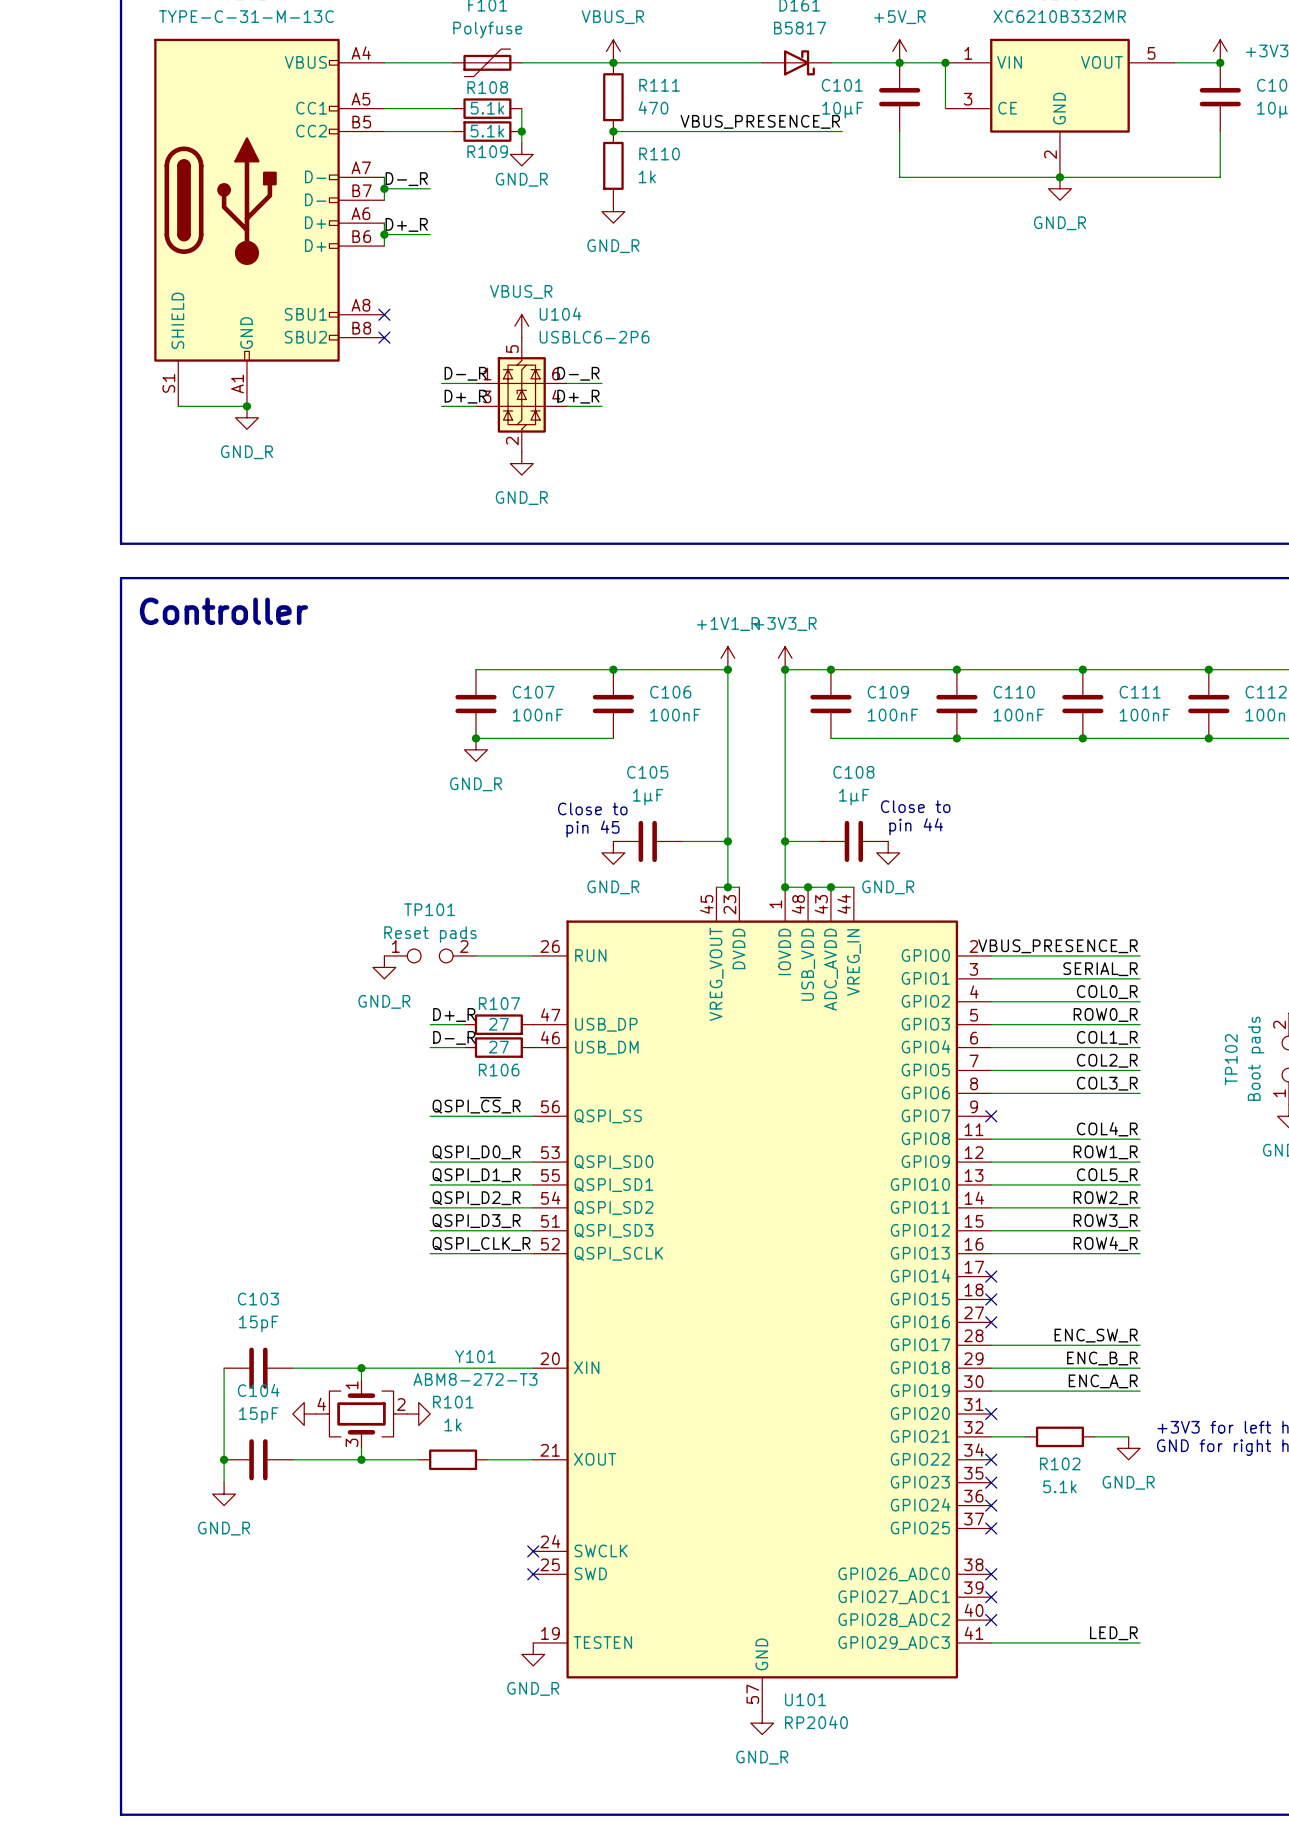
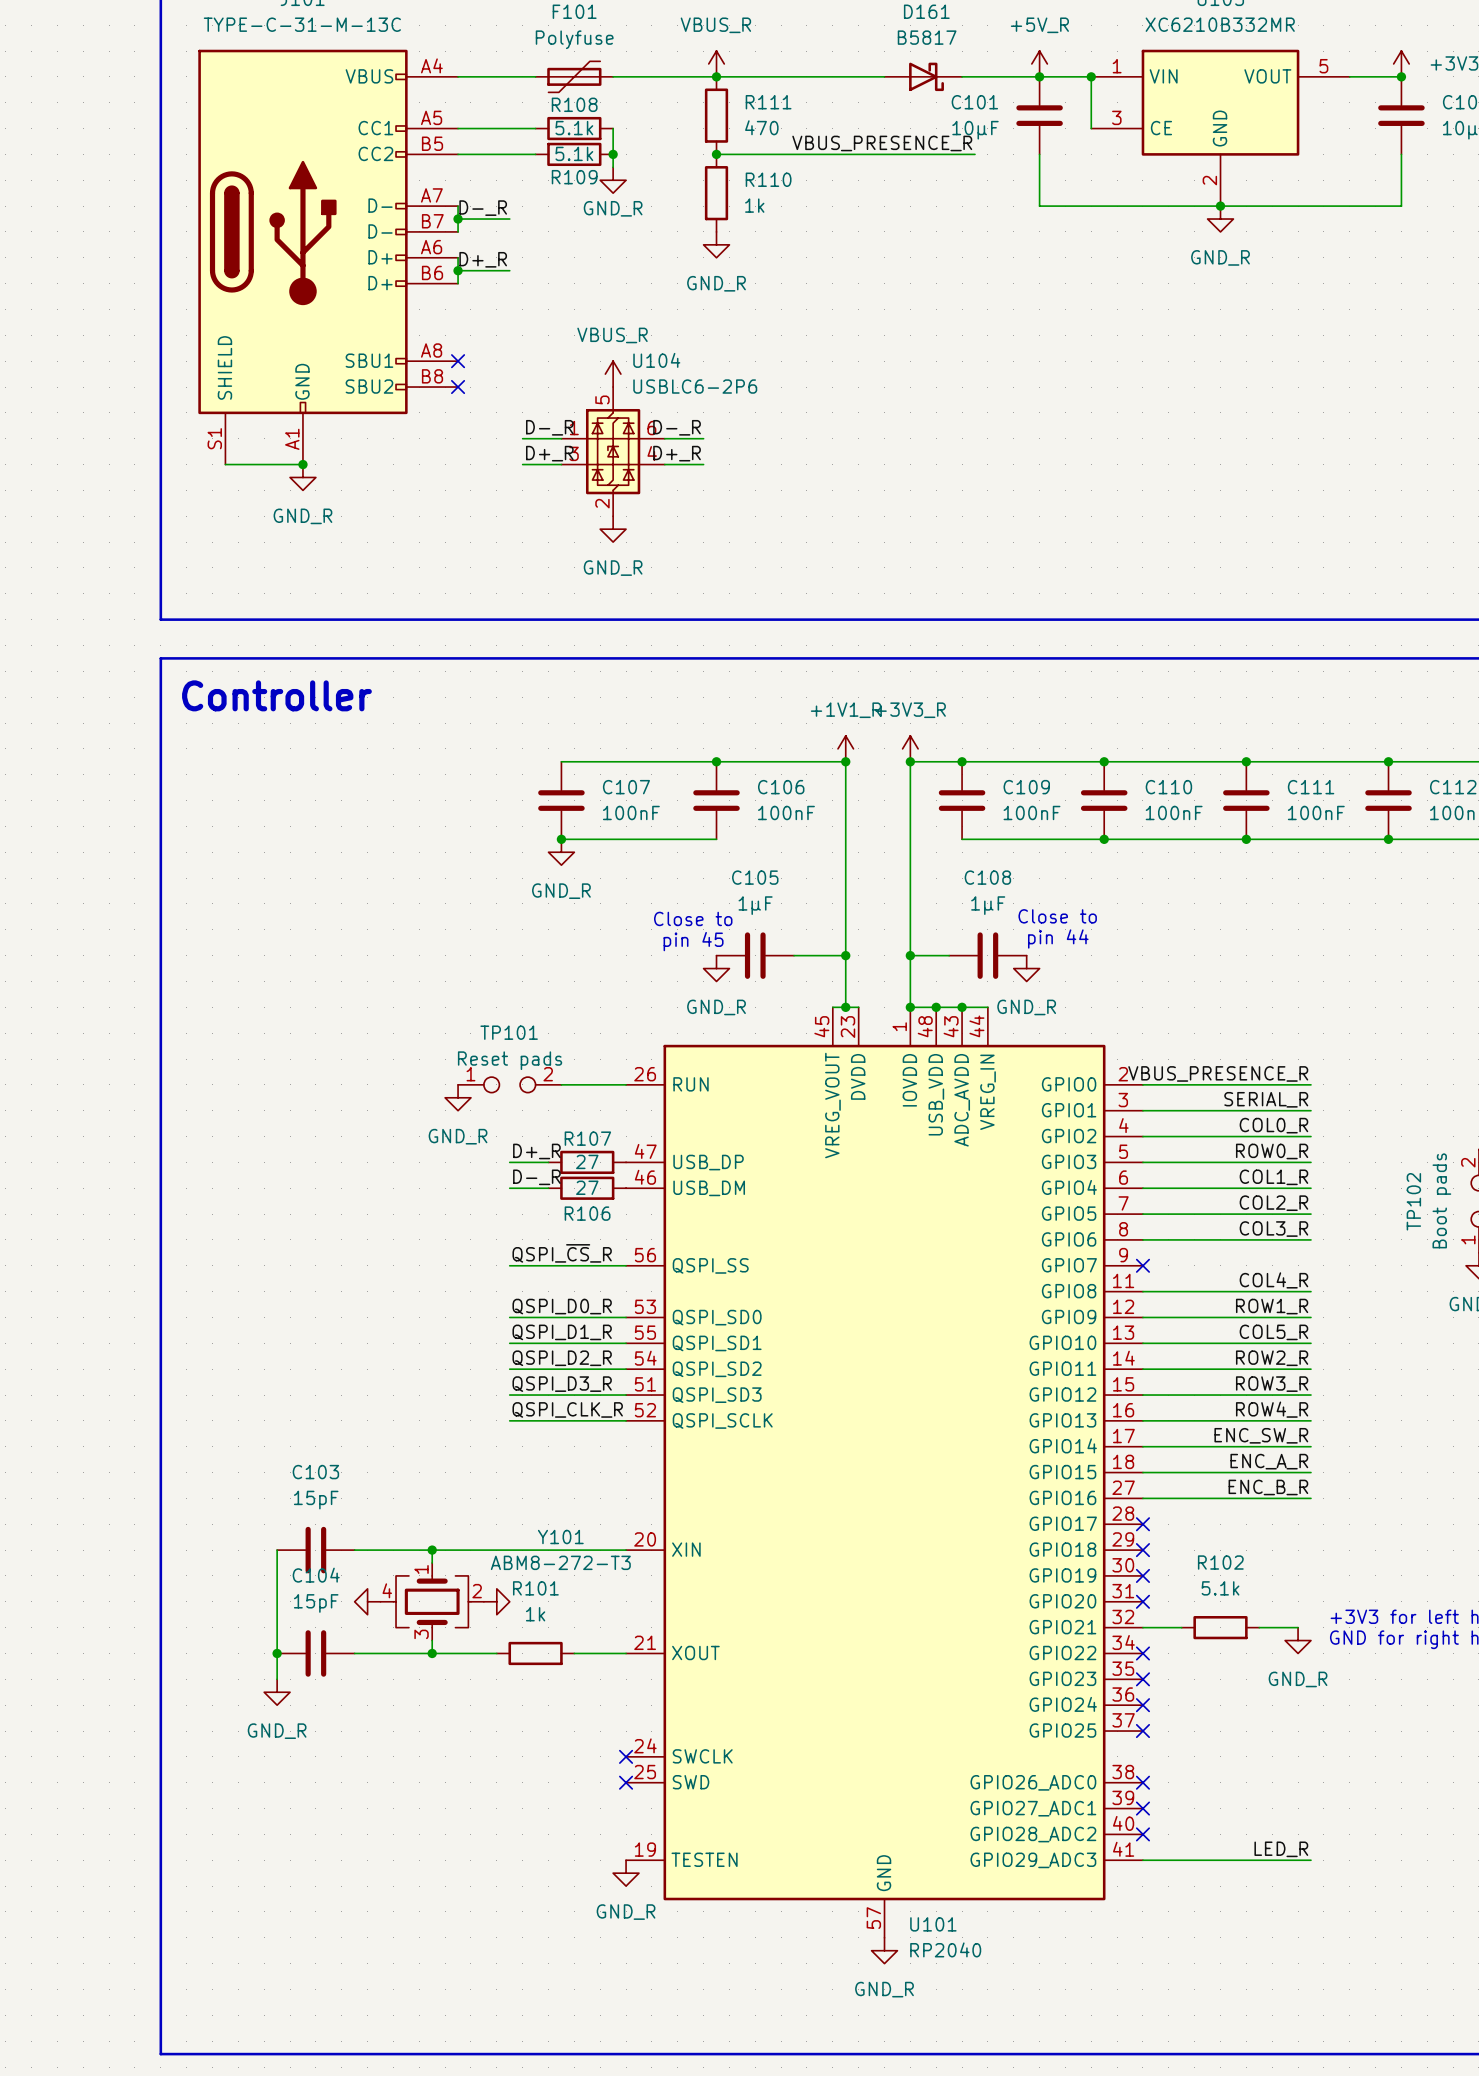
no-connect mark: (991, 1276) -> none
no-connect mark: (991, 1299) -> none
no-connect mark: (991, 1322) -> none
label position: ENC_SW_R (1096, 1335) -> ENC_SW_R (1261, 1435)
wire: (991, 1345) (1140, 1345) -> (1142, 1446) (1310, 1446)
no-connect mark: none -> (1142, 1524)
label position: ENC_B_R (1102, 1358) -> ENC_B_R (1268, 1487)
wire: (991, 1368) (1140, 1368) -> (1142, 1472) (1310, 1472)
no-connect mark: none -> (1142, 1550)
label position: ENC_A_R (1103, 1381) -> ENC_A_R (1269, 1461)
wire: (991, 1391) (1140, 1391) -> (1142, 1498) (1310, 1498)
no-connect mark: none -> (1142, 1575)
R102 name position: R102 (1060, 1463) -> R102 (1220, 1562)
R102 value position: 5.1k (1059, 1486) -> 5.1k (1220, 1588)

